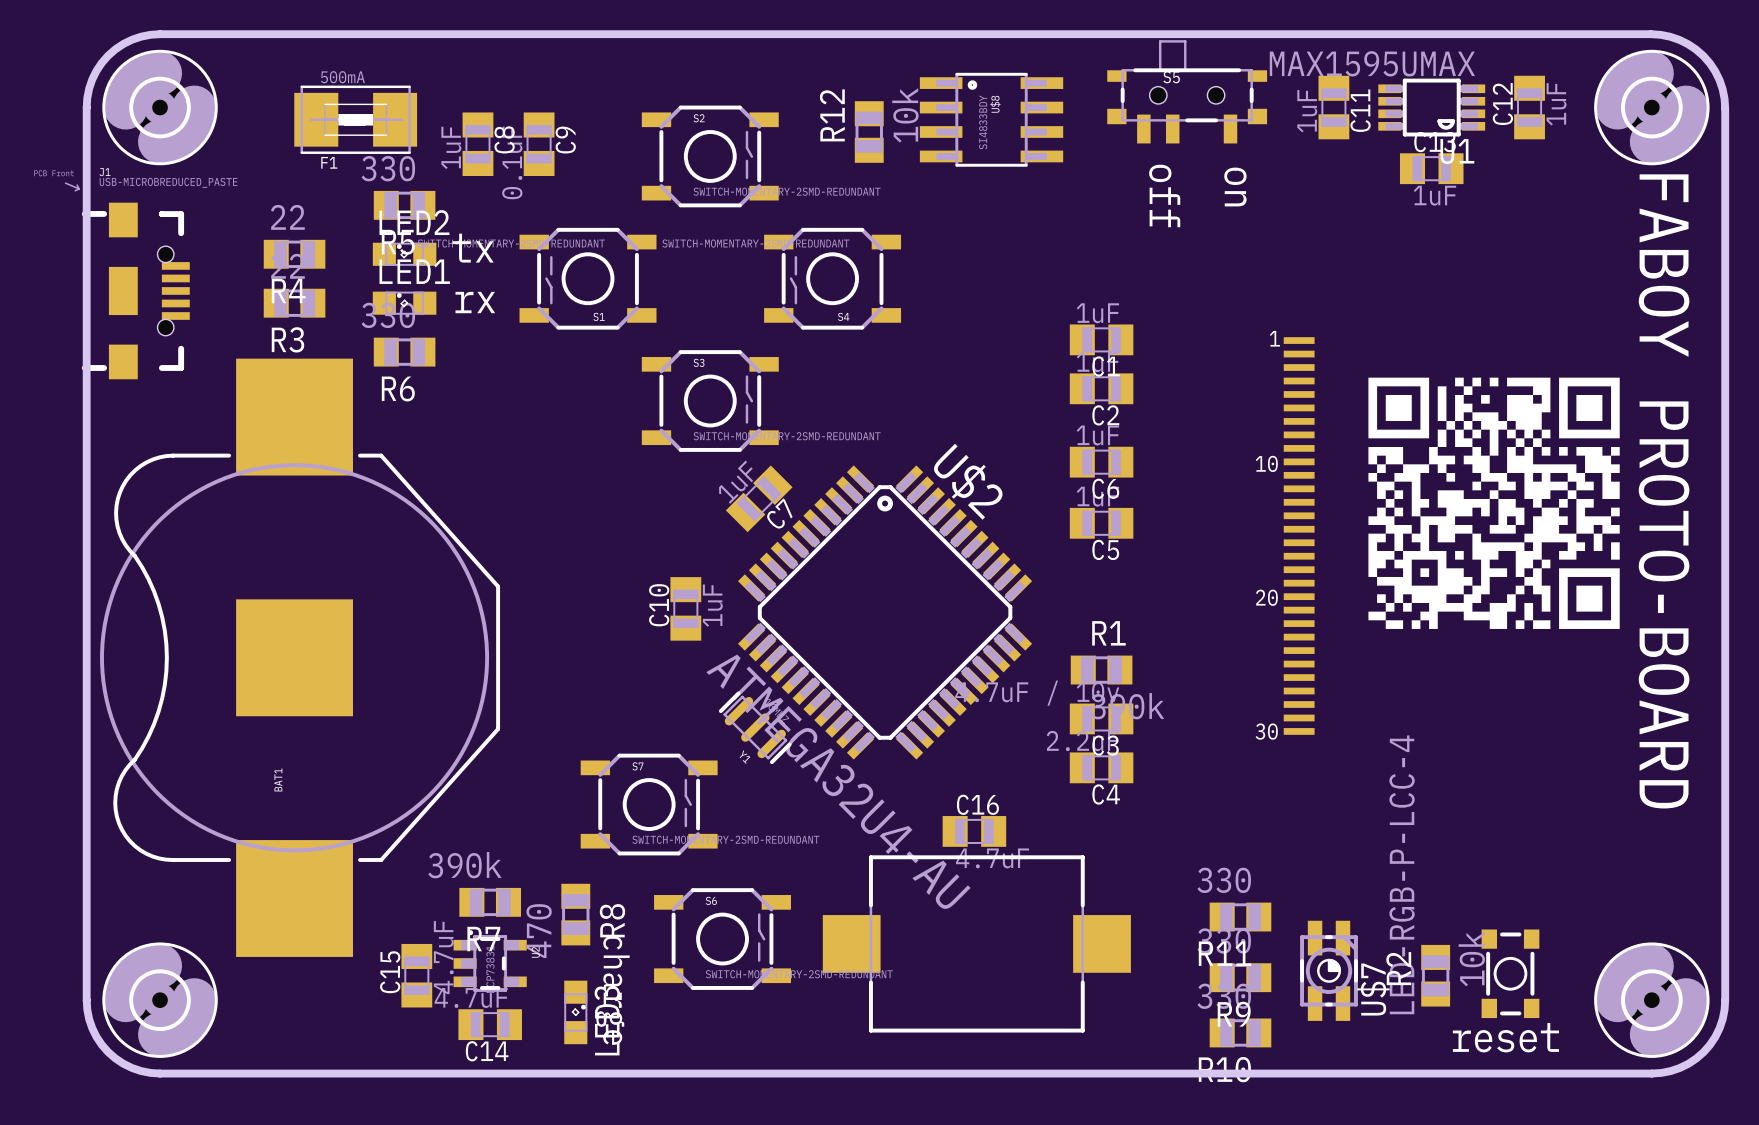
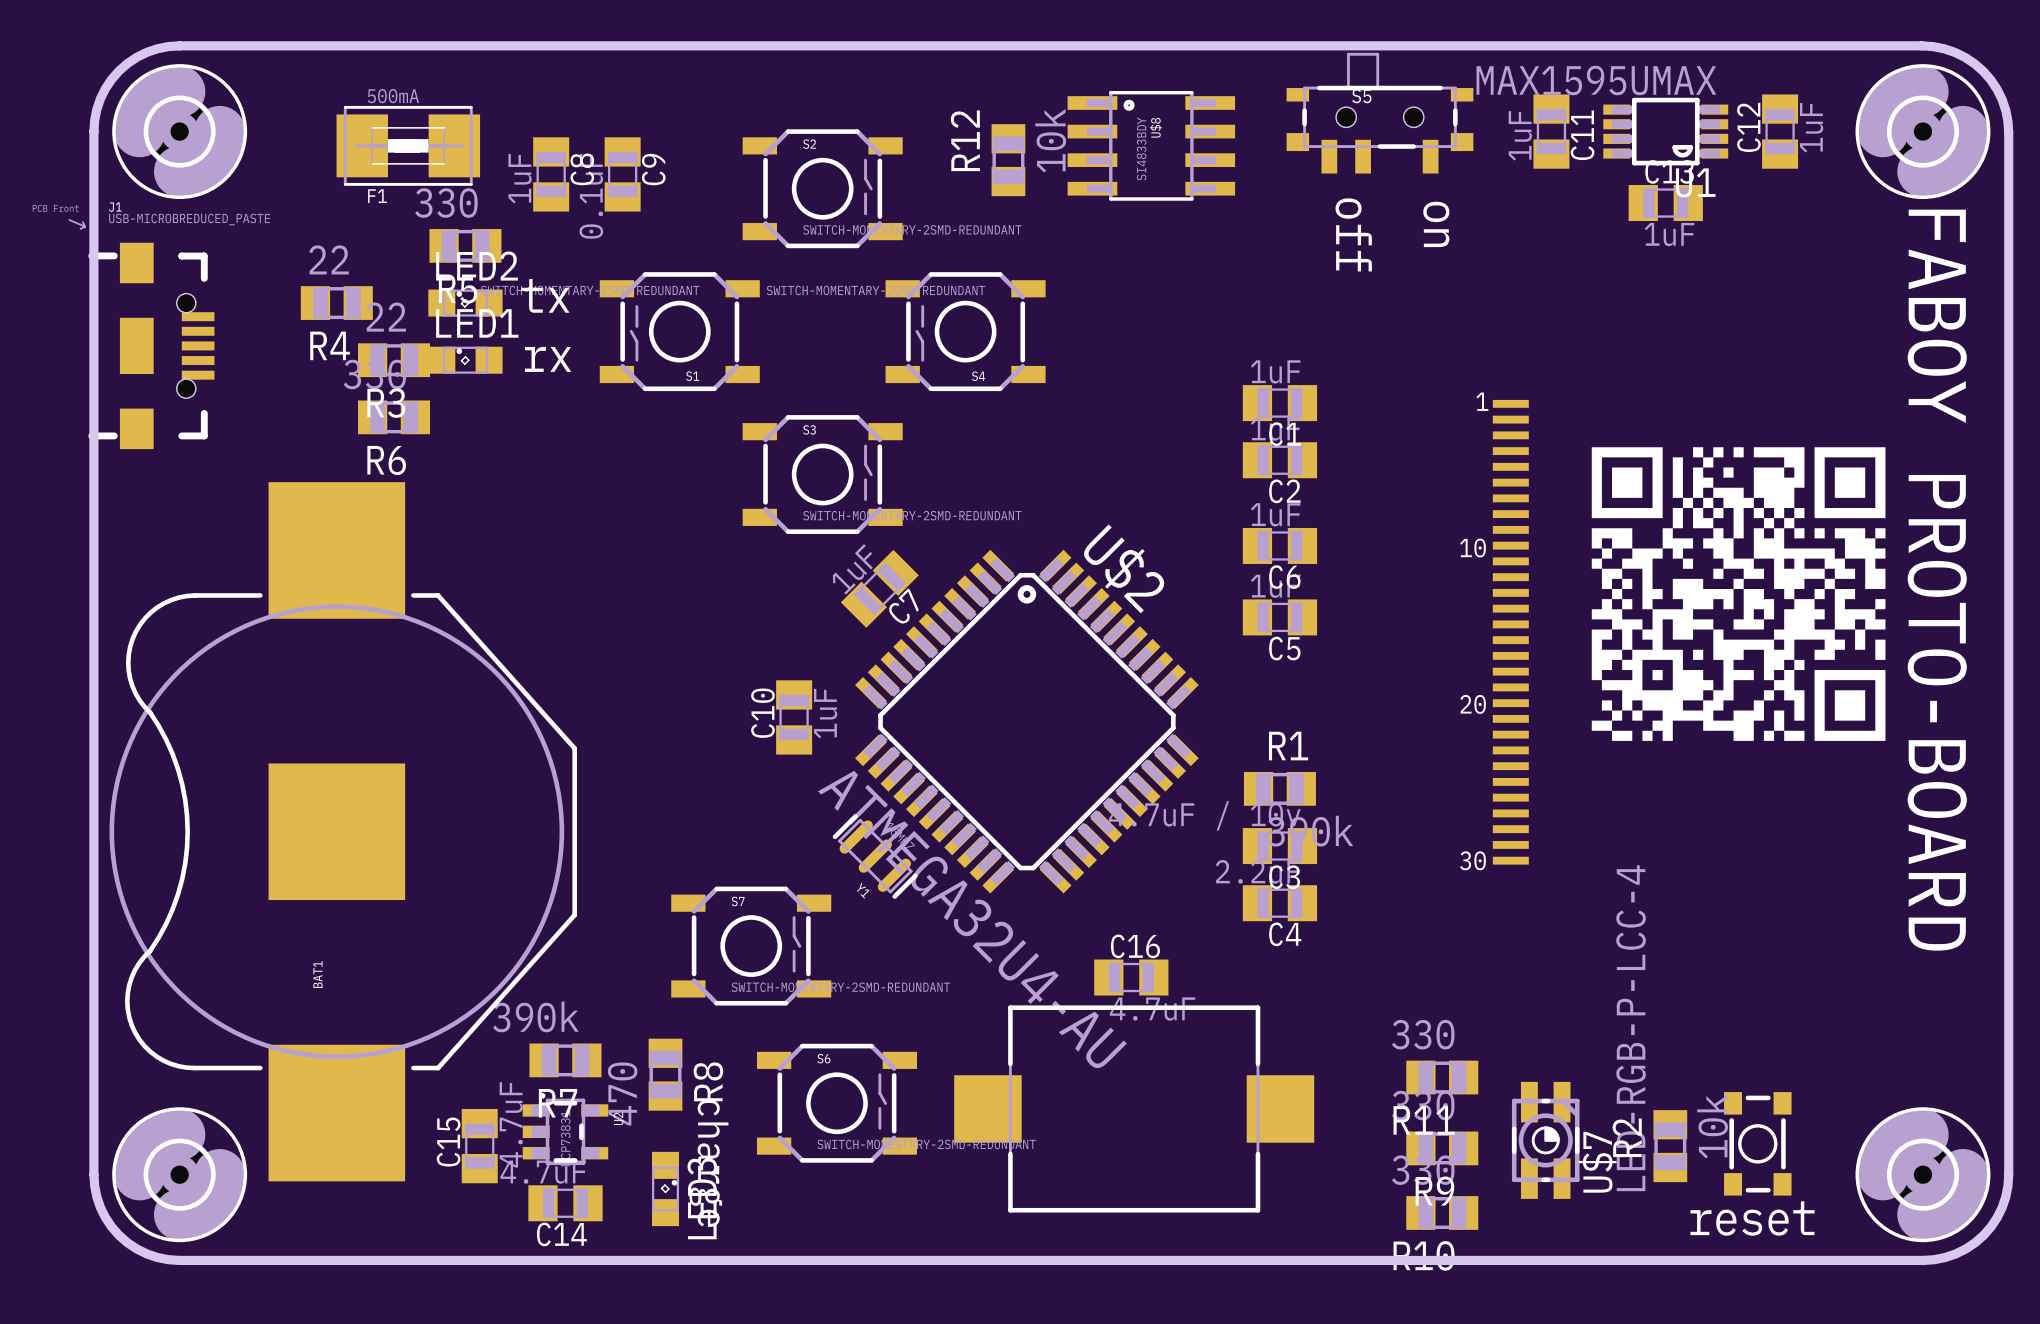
R3 position: (294, 303) -> (394, 360)
R6 position: (404, 352) -> (394, 417)
BAT1 position: (300, 657) -> (343, 831)

